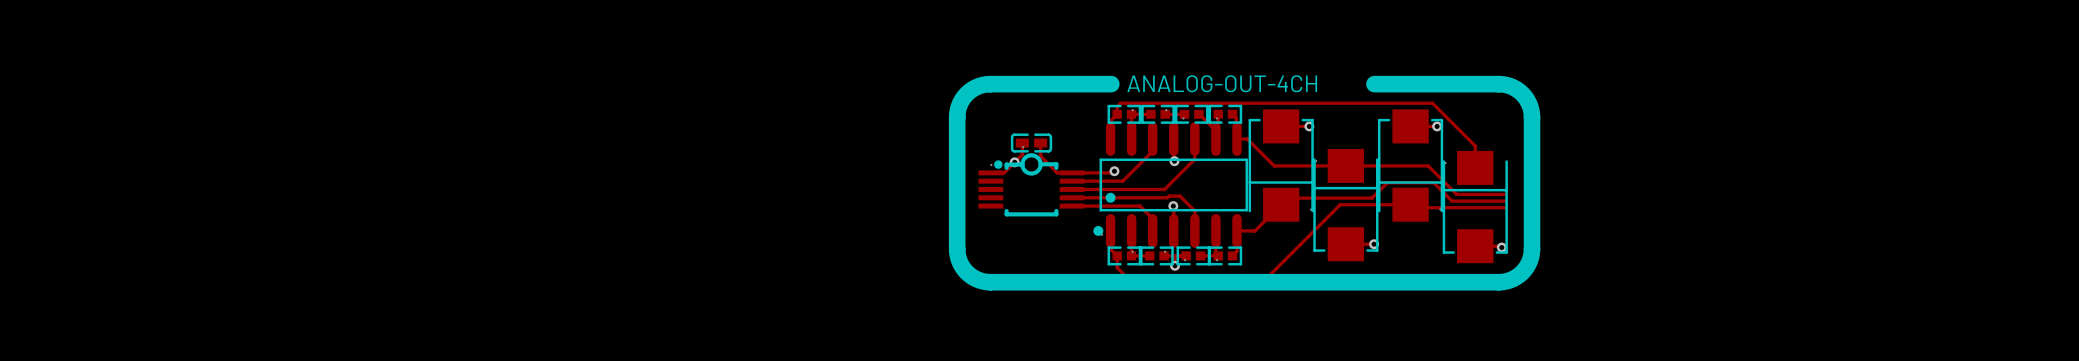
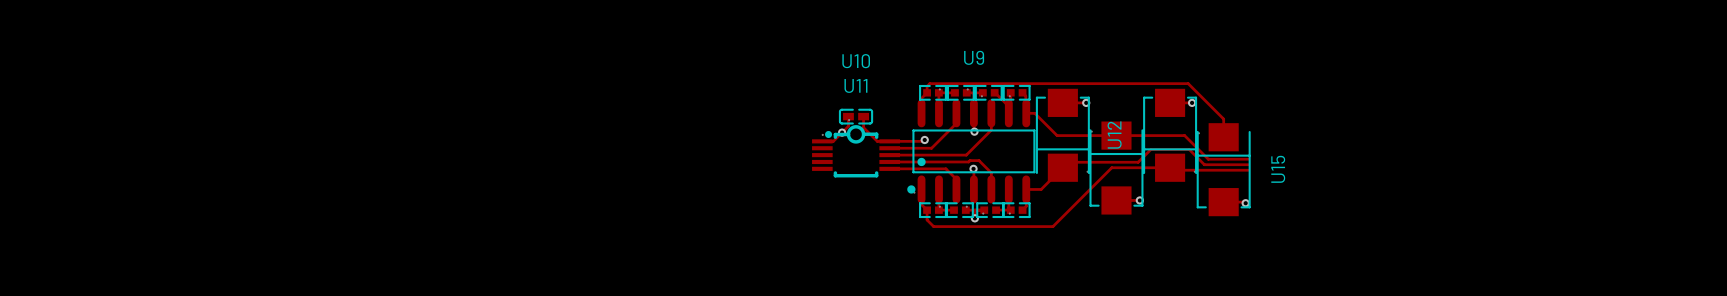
U9 name: none -> U9 (974, 57)
U10 name: none -> U10 (856, 61)
text: ANALOG-OUT-4CH (1222, 83) -> none
line: (1111, 84) (986, 84) (975, 87) (964, 96) (959, 106) (957, 117) (957, 249) (960, 263) (969, 274) (979, 280) (990, 282) (1498, 282) (1509, 280) (1519, 274) (1528, 263) (1532, 249) (1532, 117) (1530, 106) (1524, 96) (1516, 89) (1502, 84) (1374, 84) -> none
U11 name: none -> U11 (855, 85)
U12 name: none -> U12 (1114, 135)
U15 name: none -> U15 (1278, 169)

